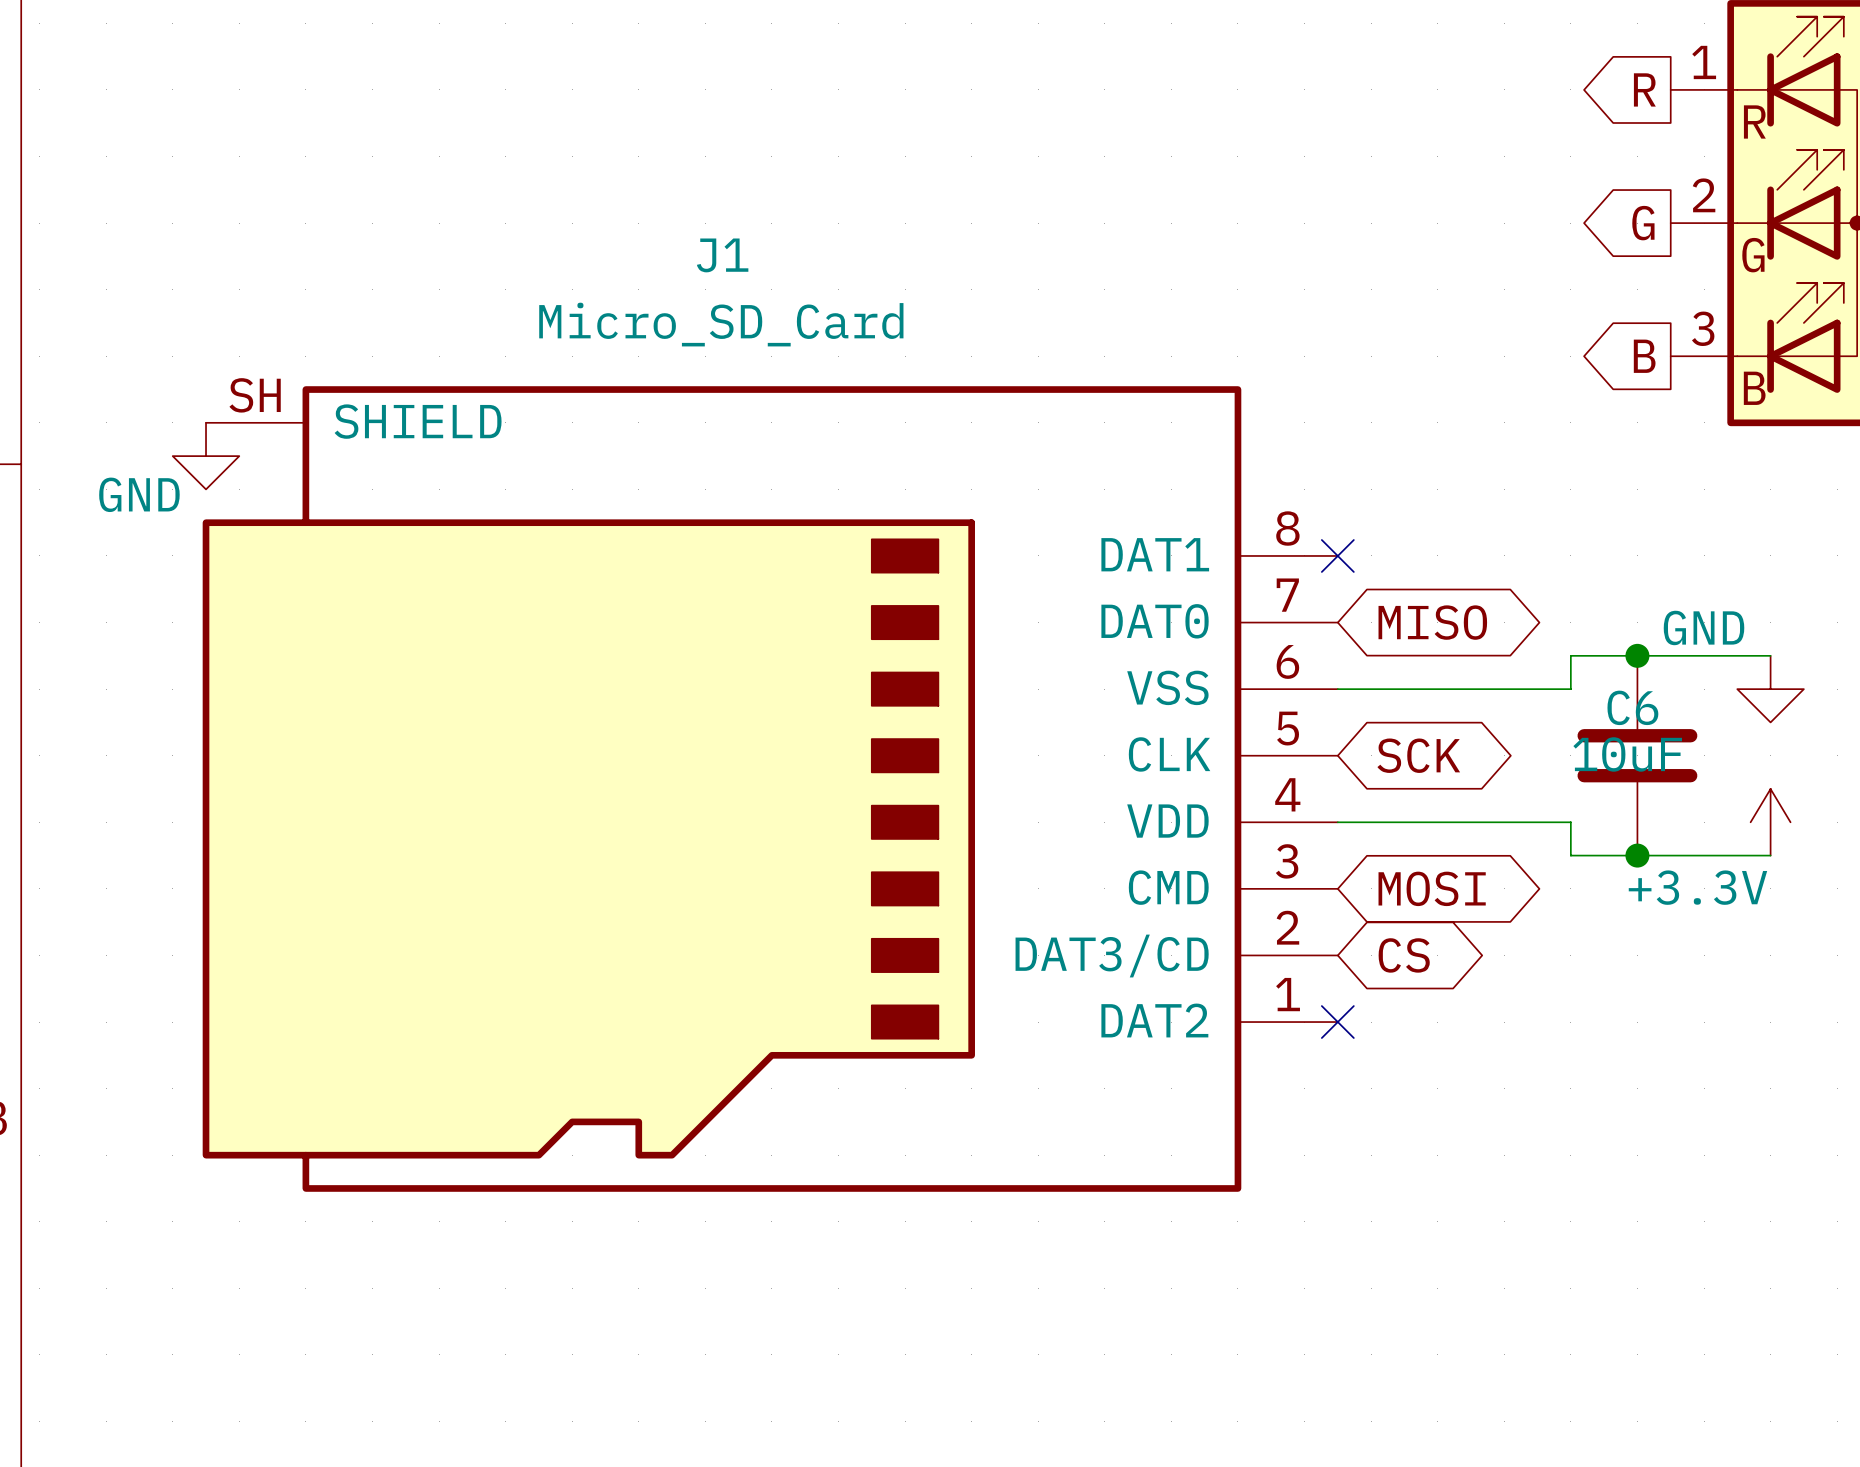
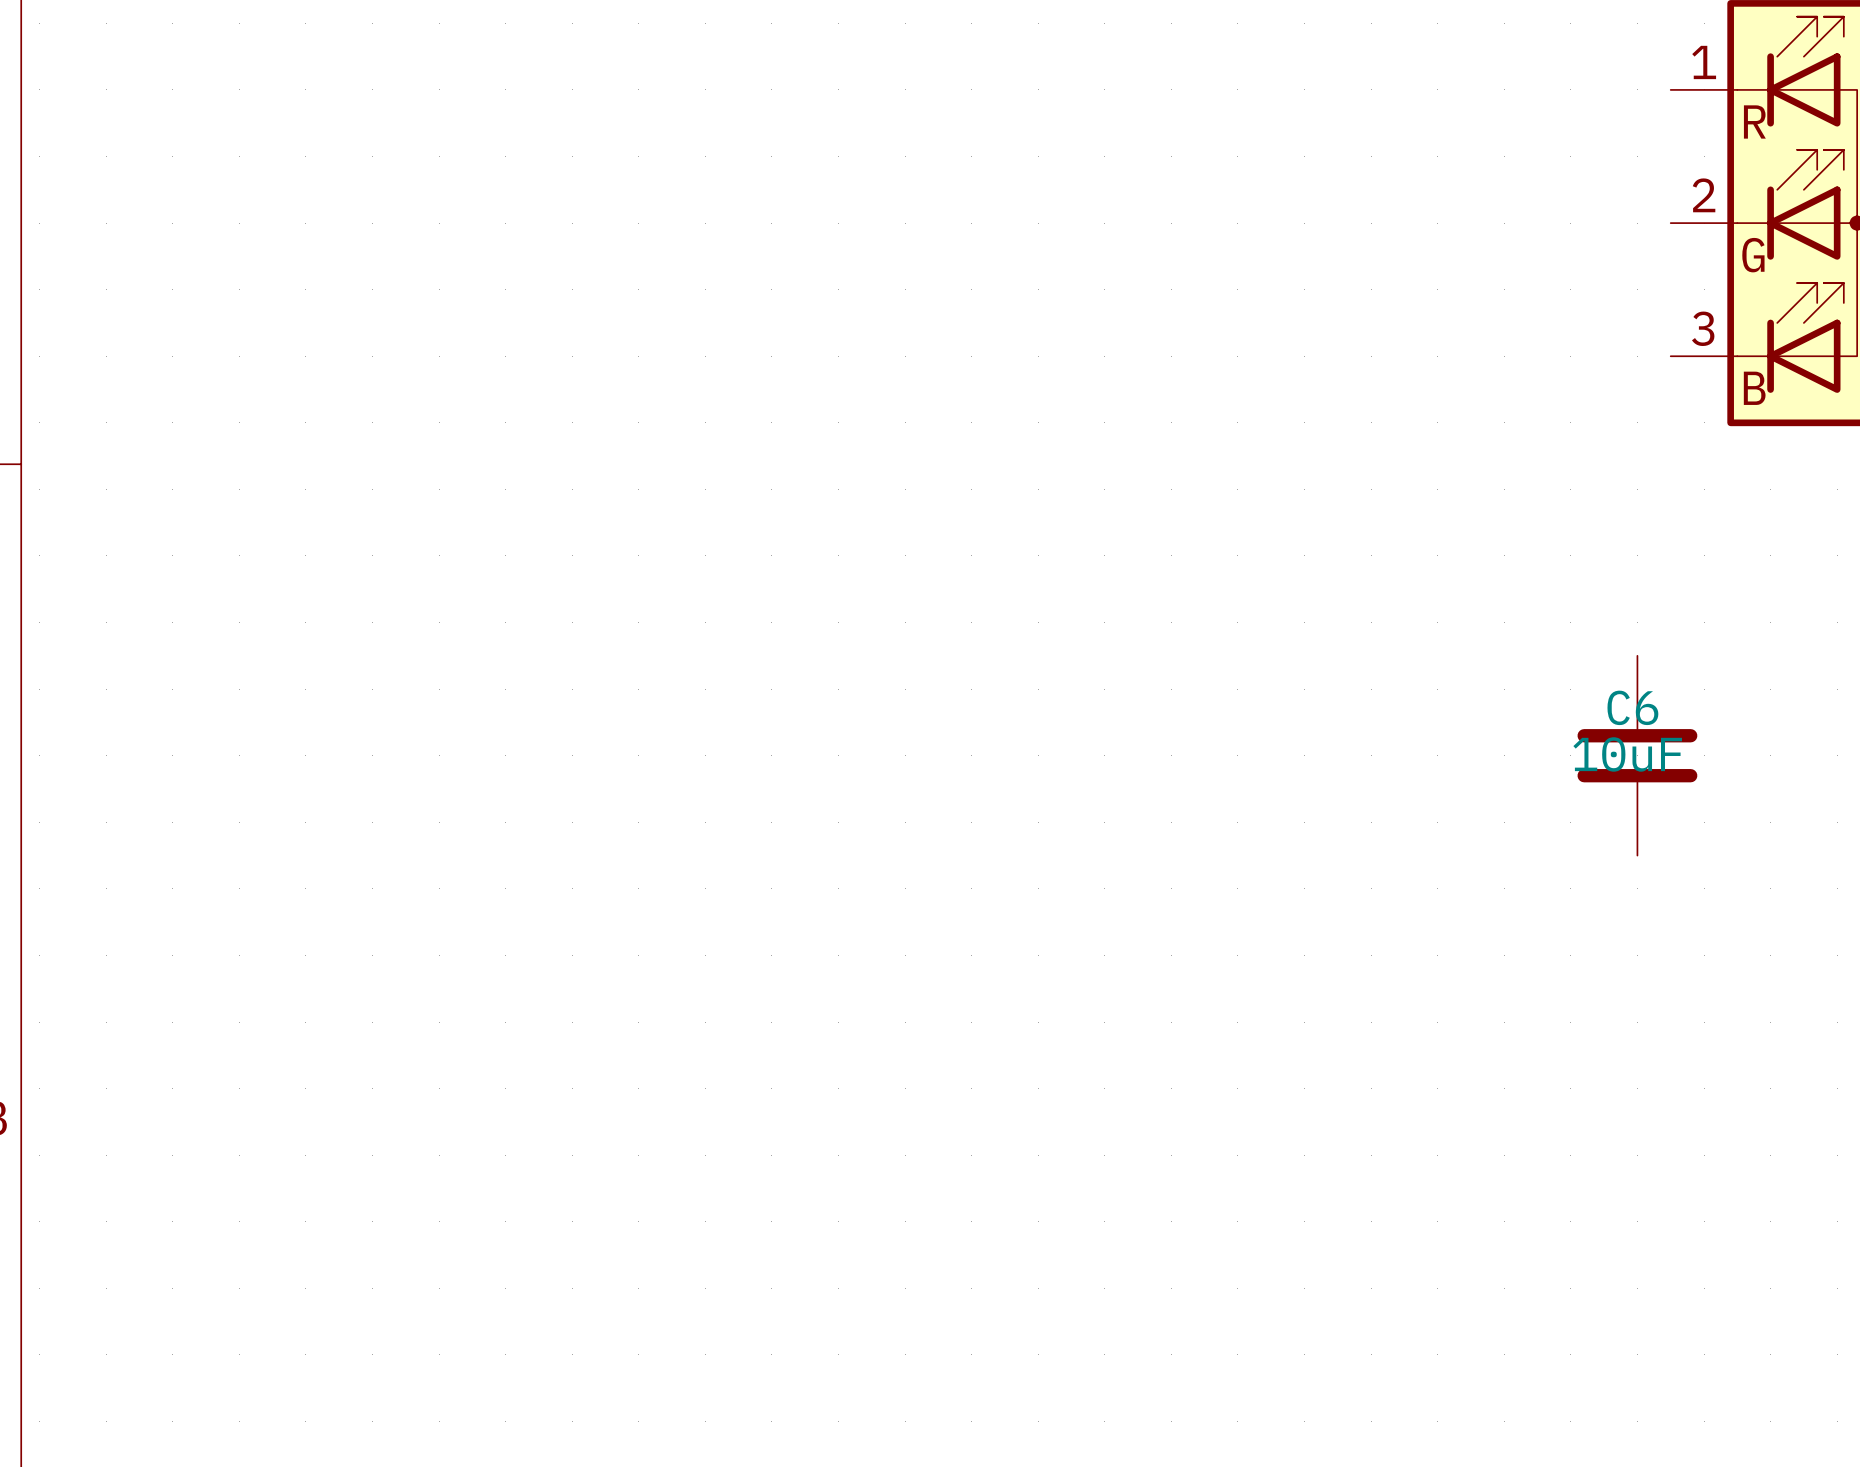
global label: R (1644, 89) -> none
global label: G (1643, 223) -> none
global label: B (1644, 356) -> none
power symbol: GND (206, 456) -> none
no-connect mark: (1337, 555) -> none
global label: MISO (1432, 622) -> none
junction: (1637, 655) -> none
wire: (1770, 655) (1570, 655) (1570, 689) (1337, 689) -> none
power symbol: GND (1770, 689) -> none
global label: SCK (1418, 755) -> none
J1: Micro_SD_Card (770, 789) -> none
wire: (1337, 822) (1570, 822) (1570, 855) (1770, 855) -> none
power symbol: +3.3V (1770, 822) -> none
junction: (1637, 855) -> none
global label: MOSI (1432, 888) -> none
global label: CS (1404, 955) -> none
no-connect mark: (1337, 1022) -> none

